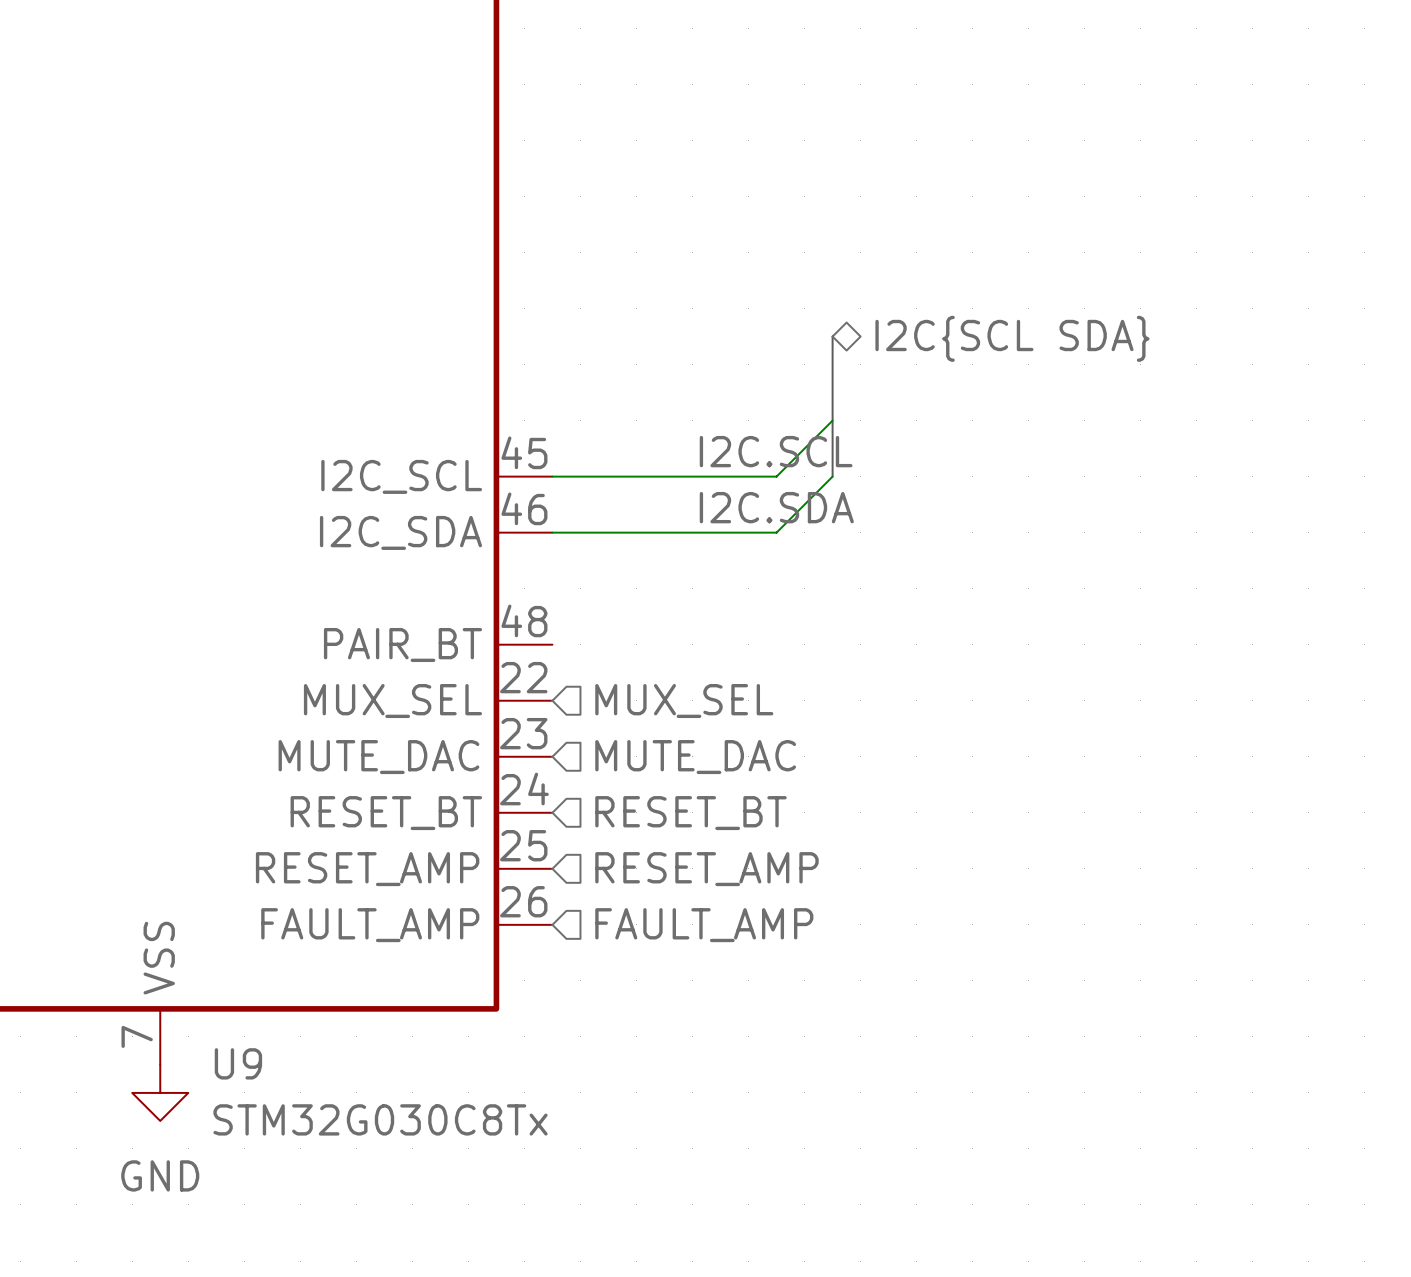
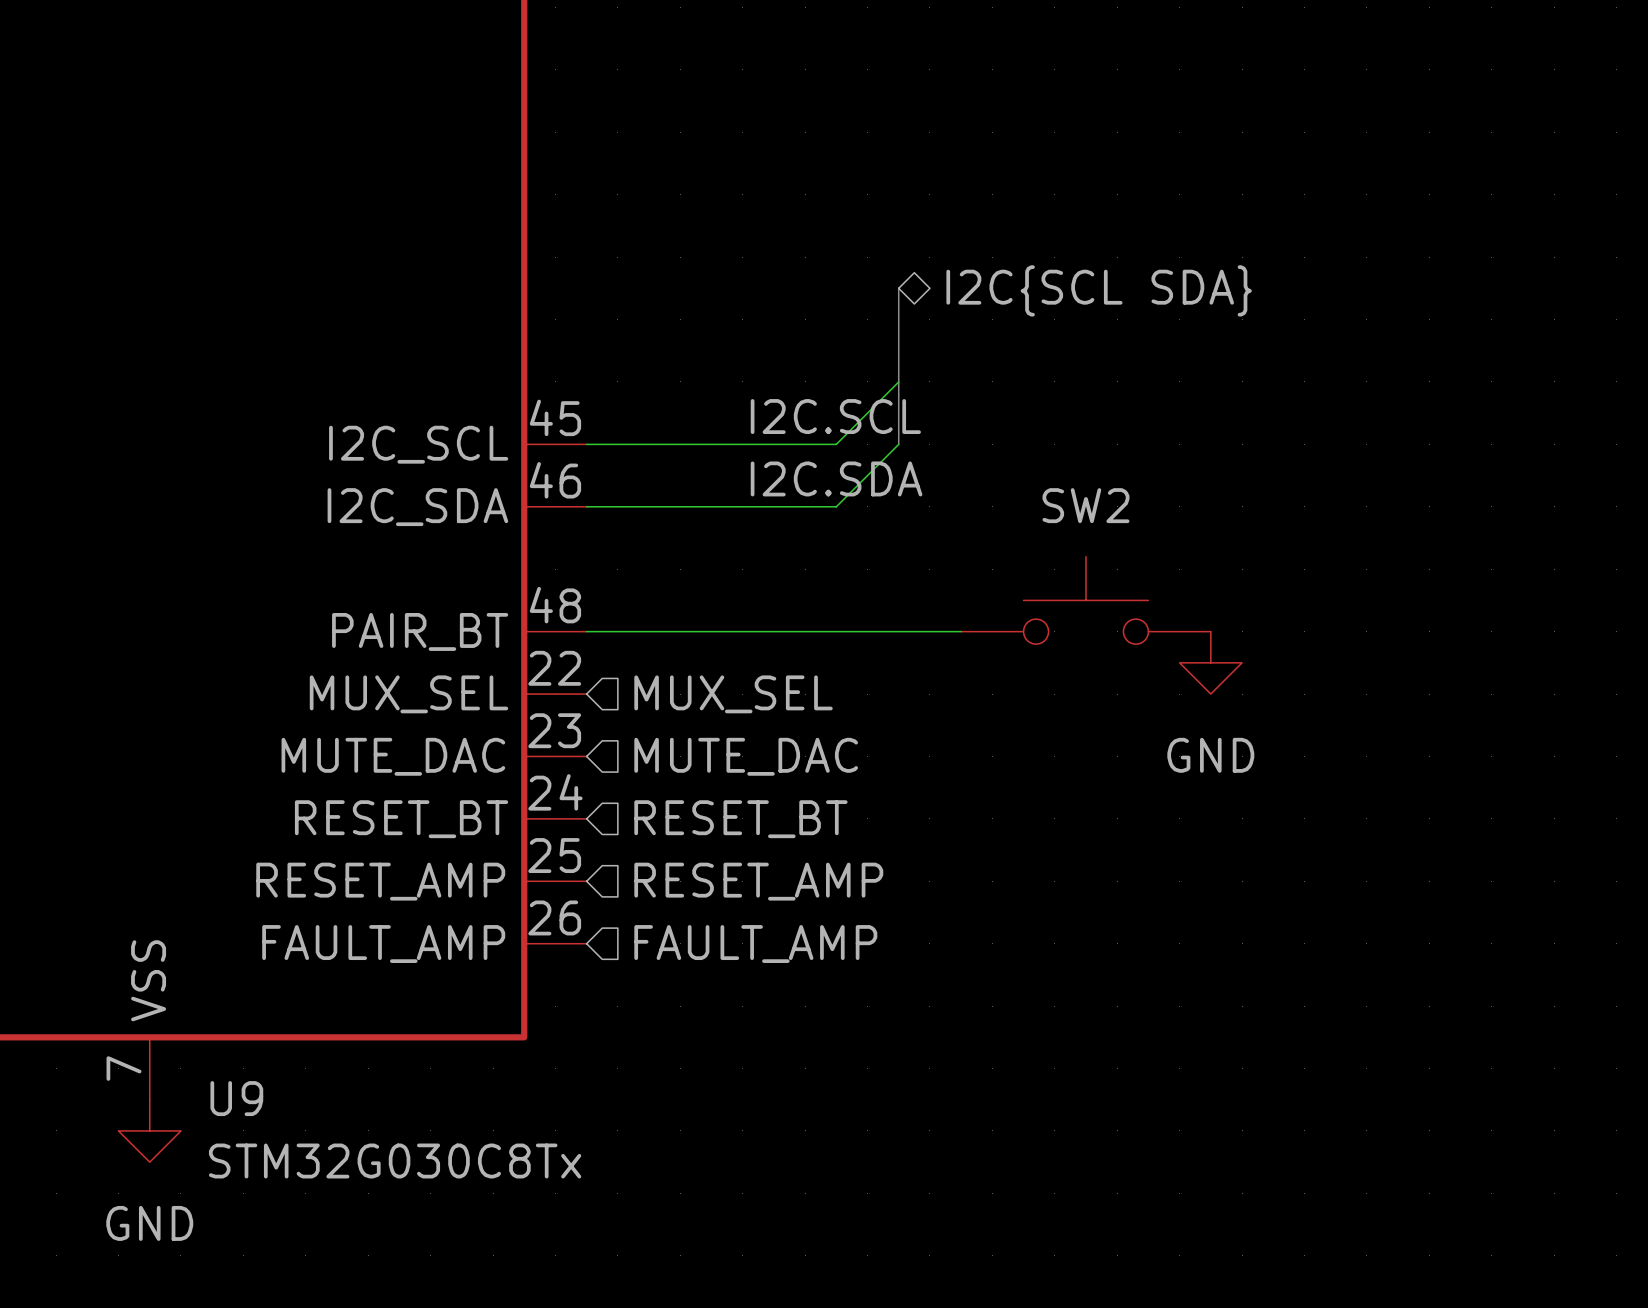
SW2: none -> (1085, 600)
wire: none -> (586, 631) (961, 631)
power symbol: none -> GND (1210, 662)

